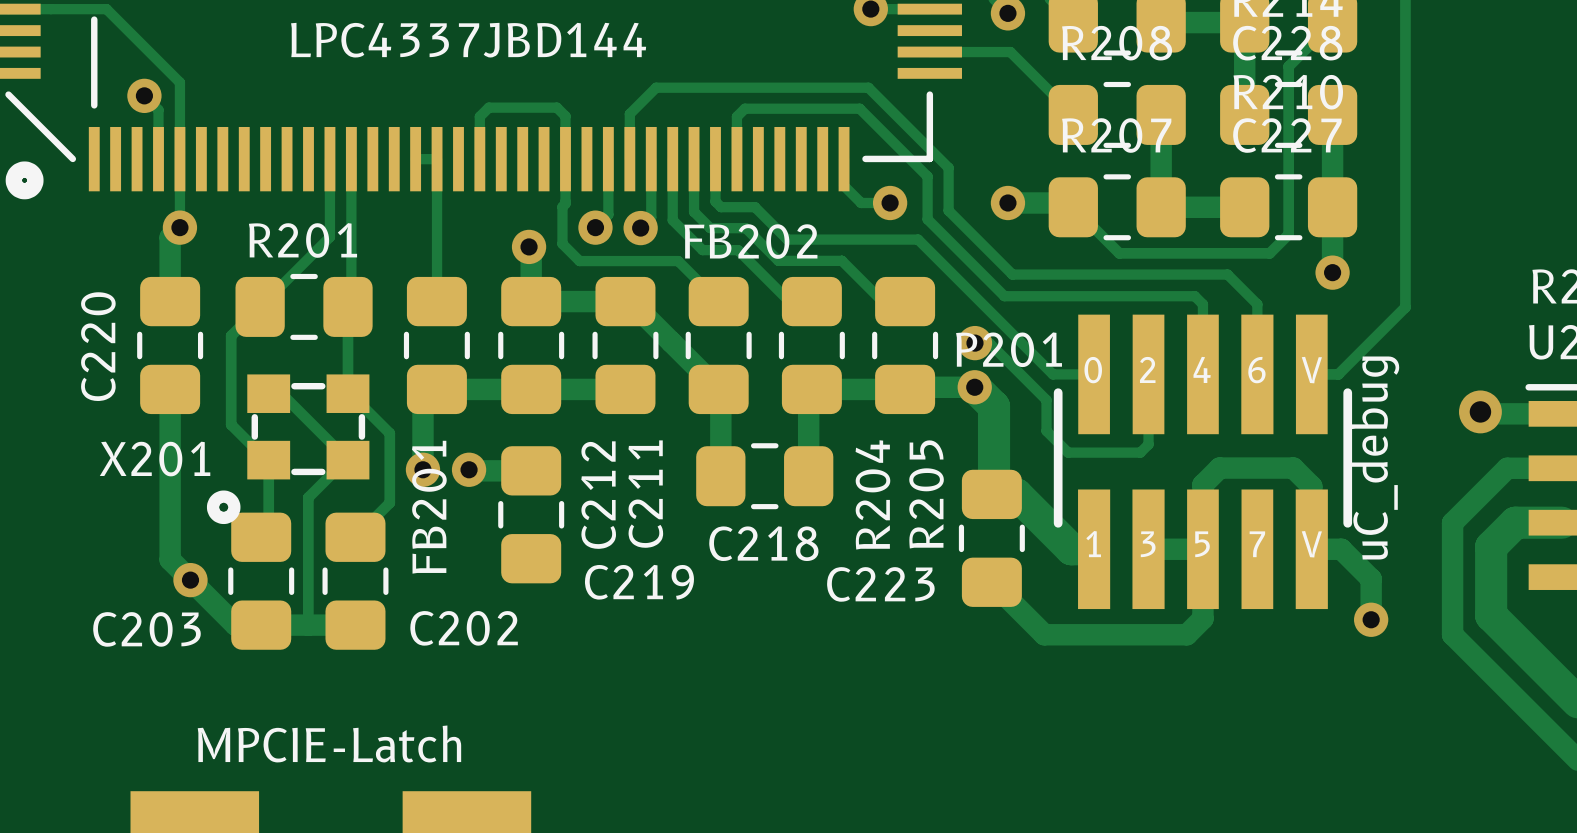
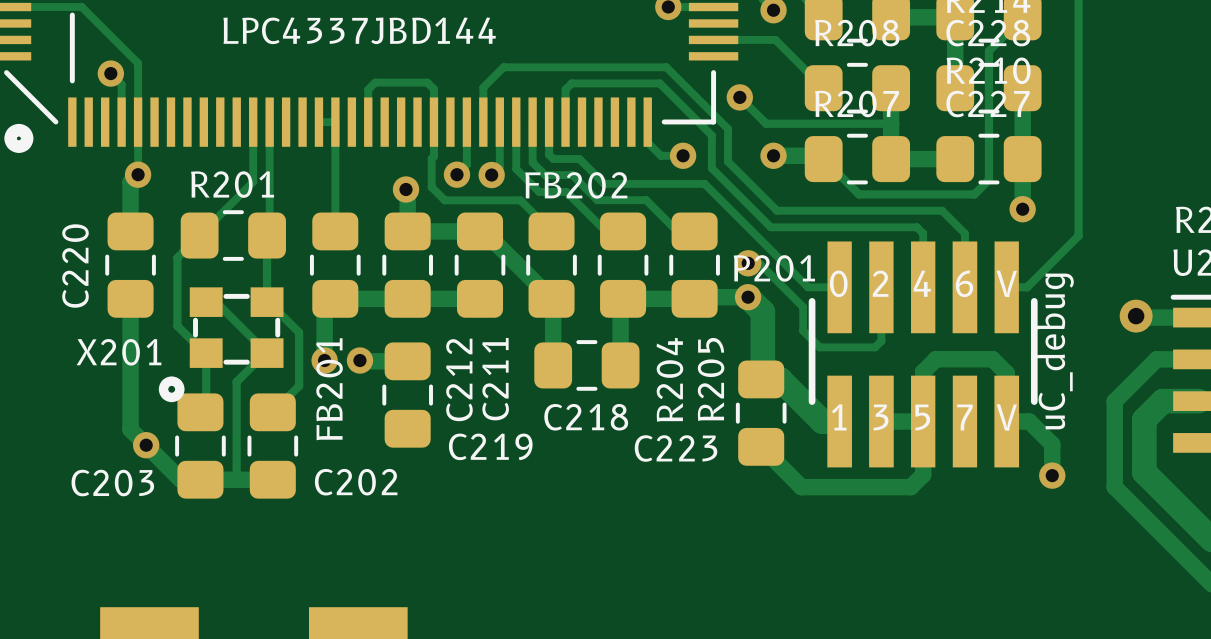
track: none -> (739, 97) (766, 123) (891, 123)
via: none -> (739, 97)
P201 footprint: [1053, 314, 1353, 610] -> [808, 241, 1038, 468]
text: MPCIE-Latch (329, 743) -> none

